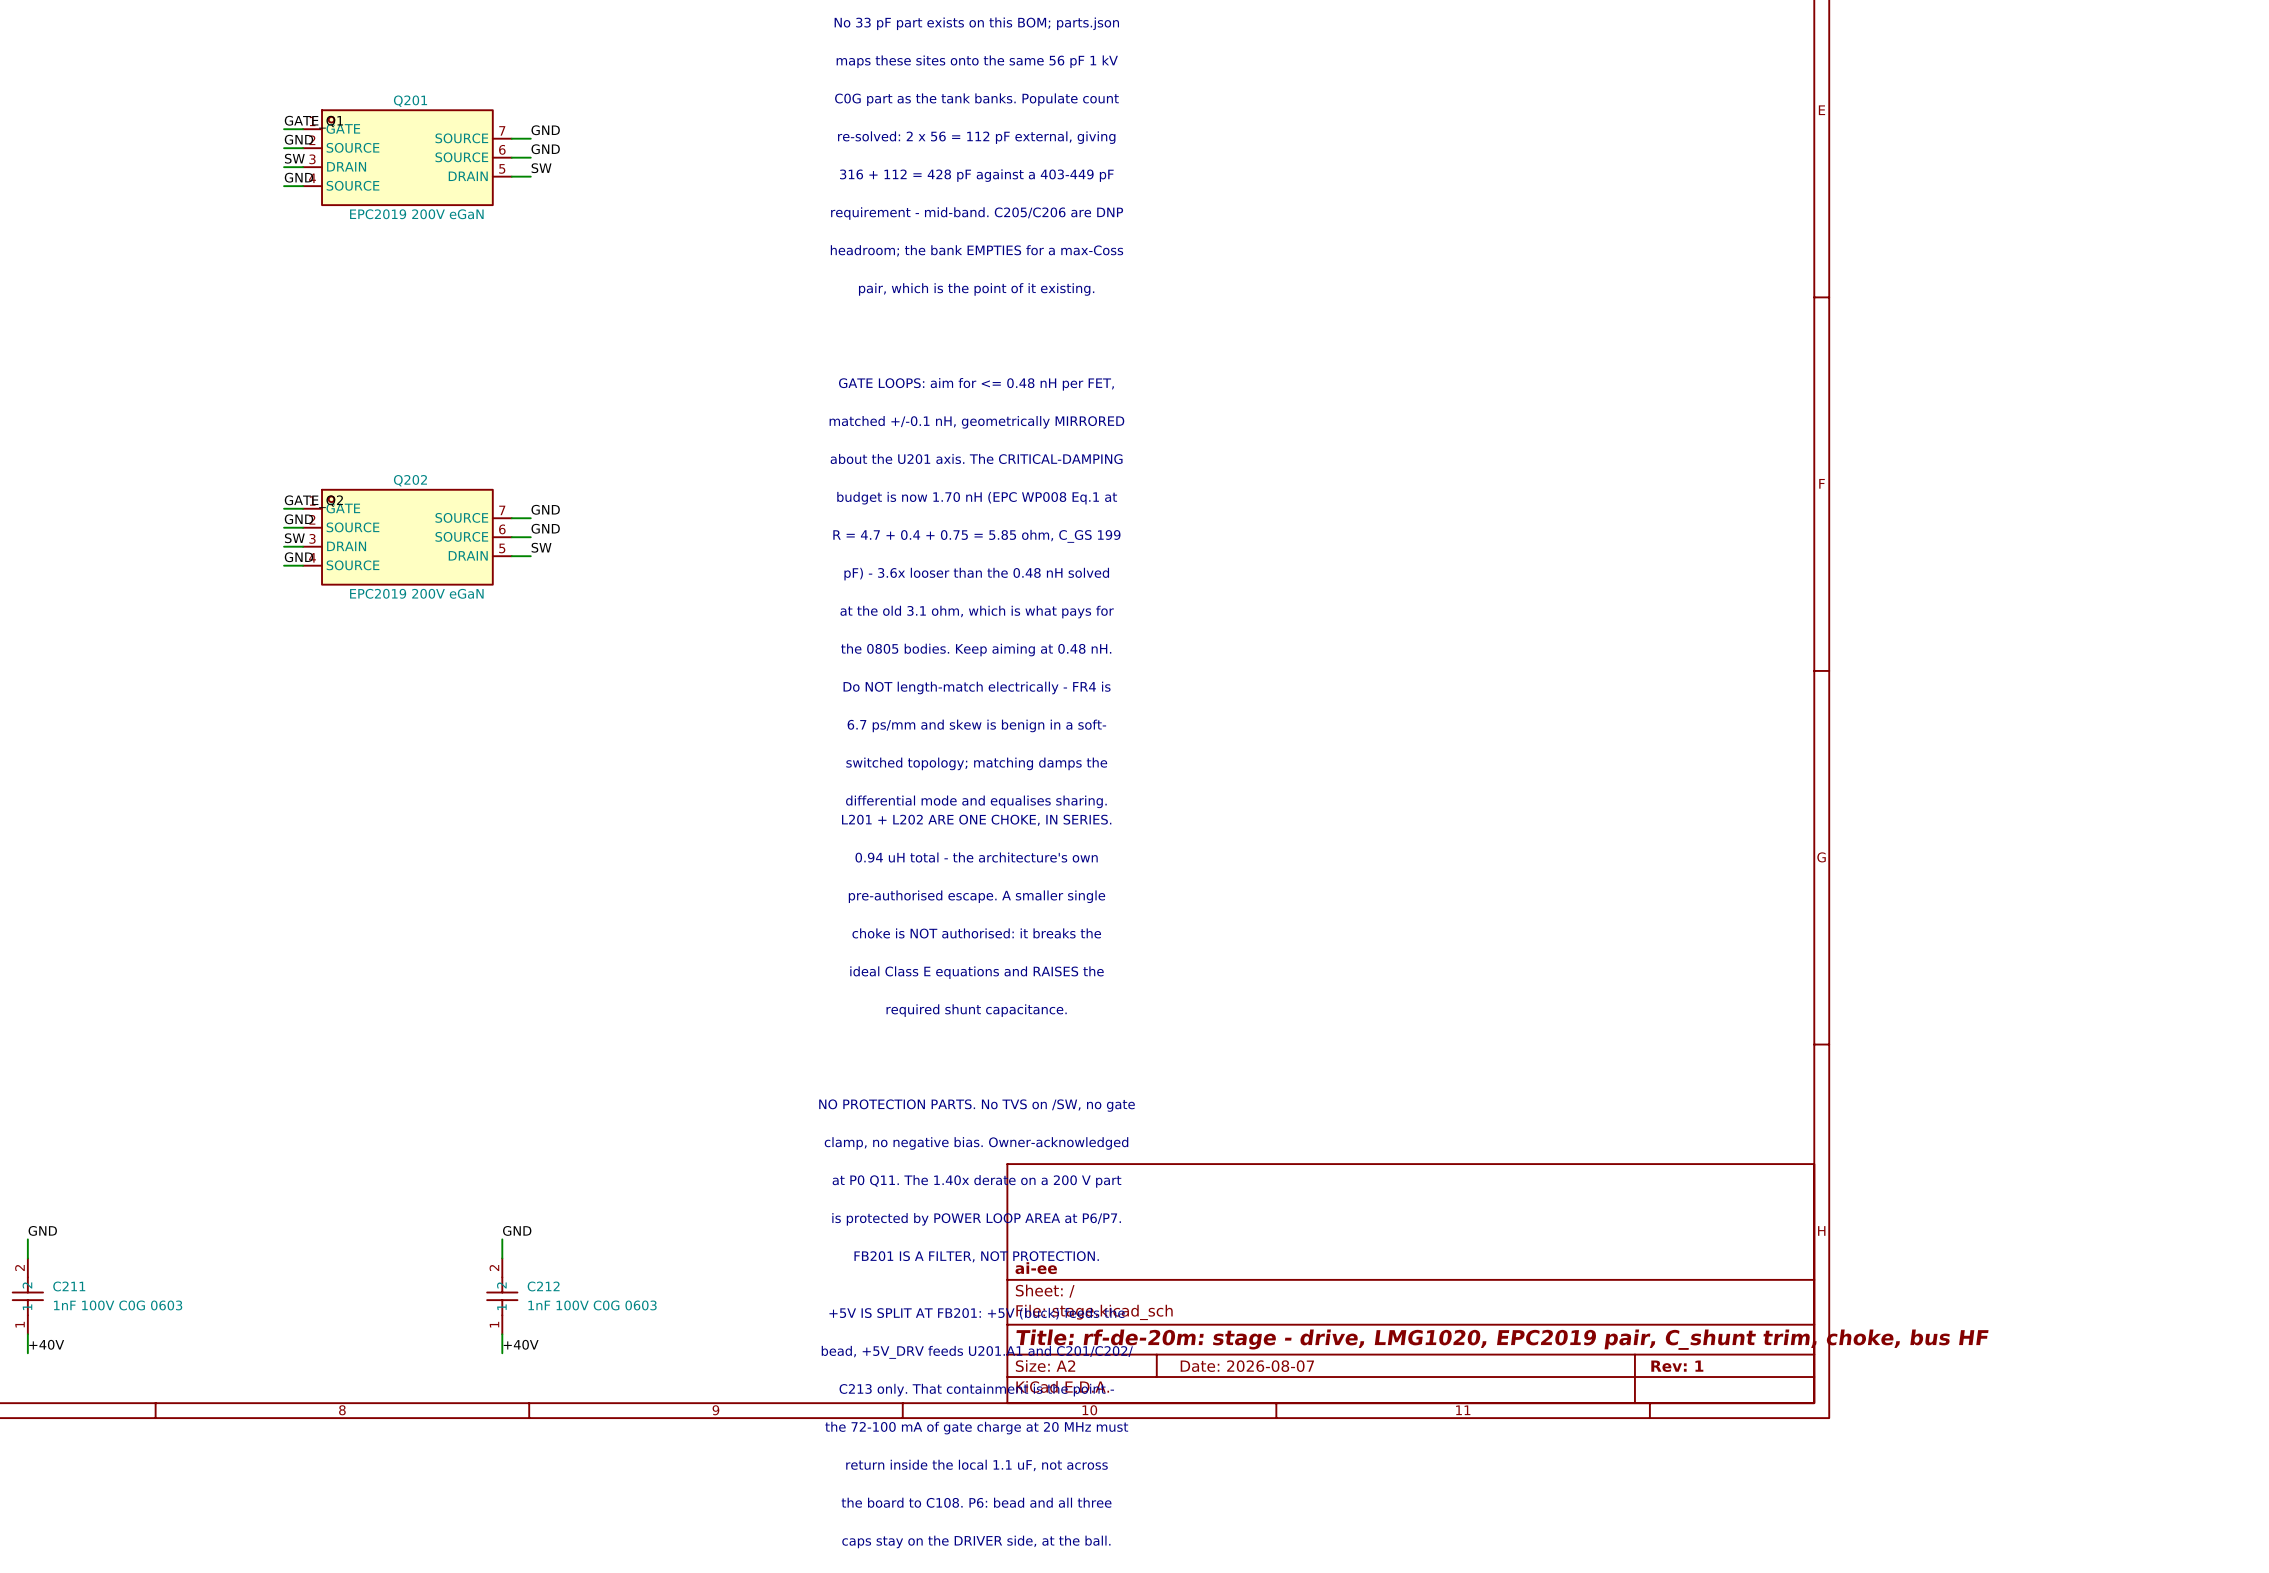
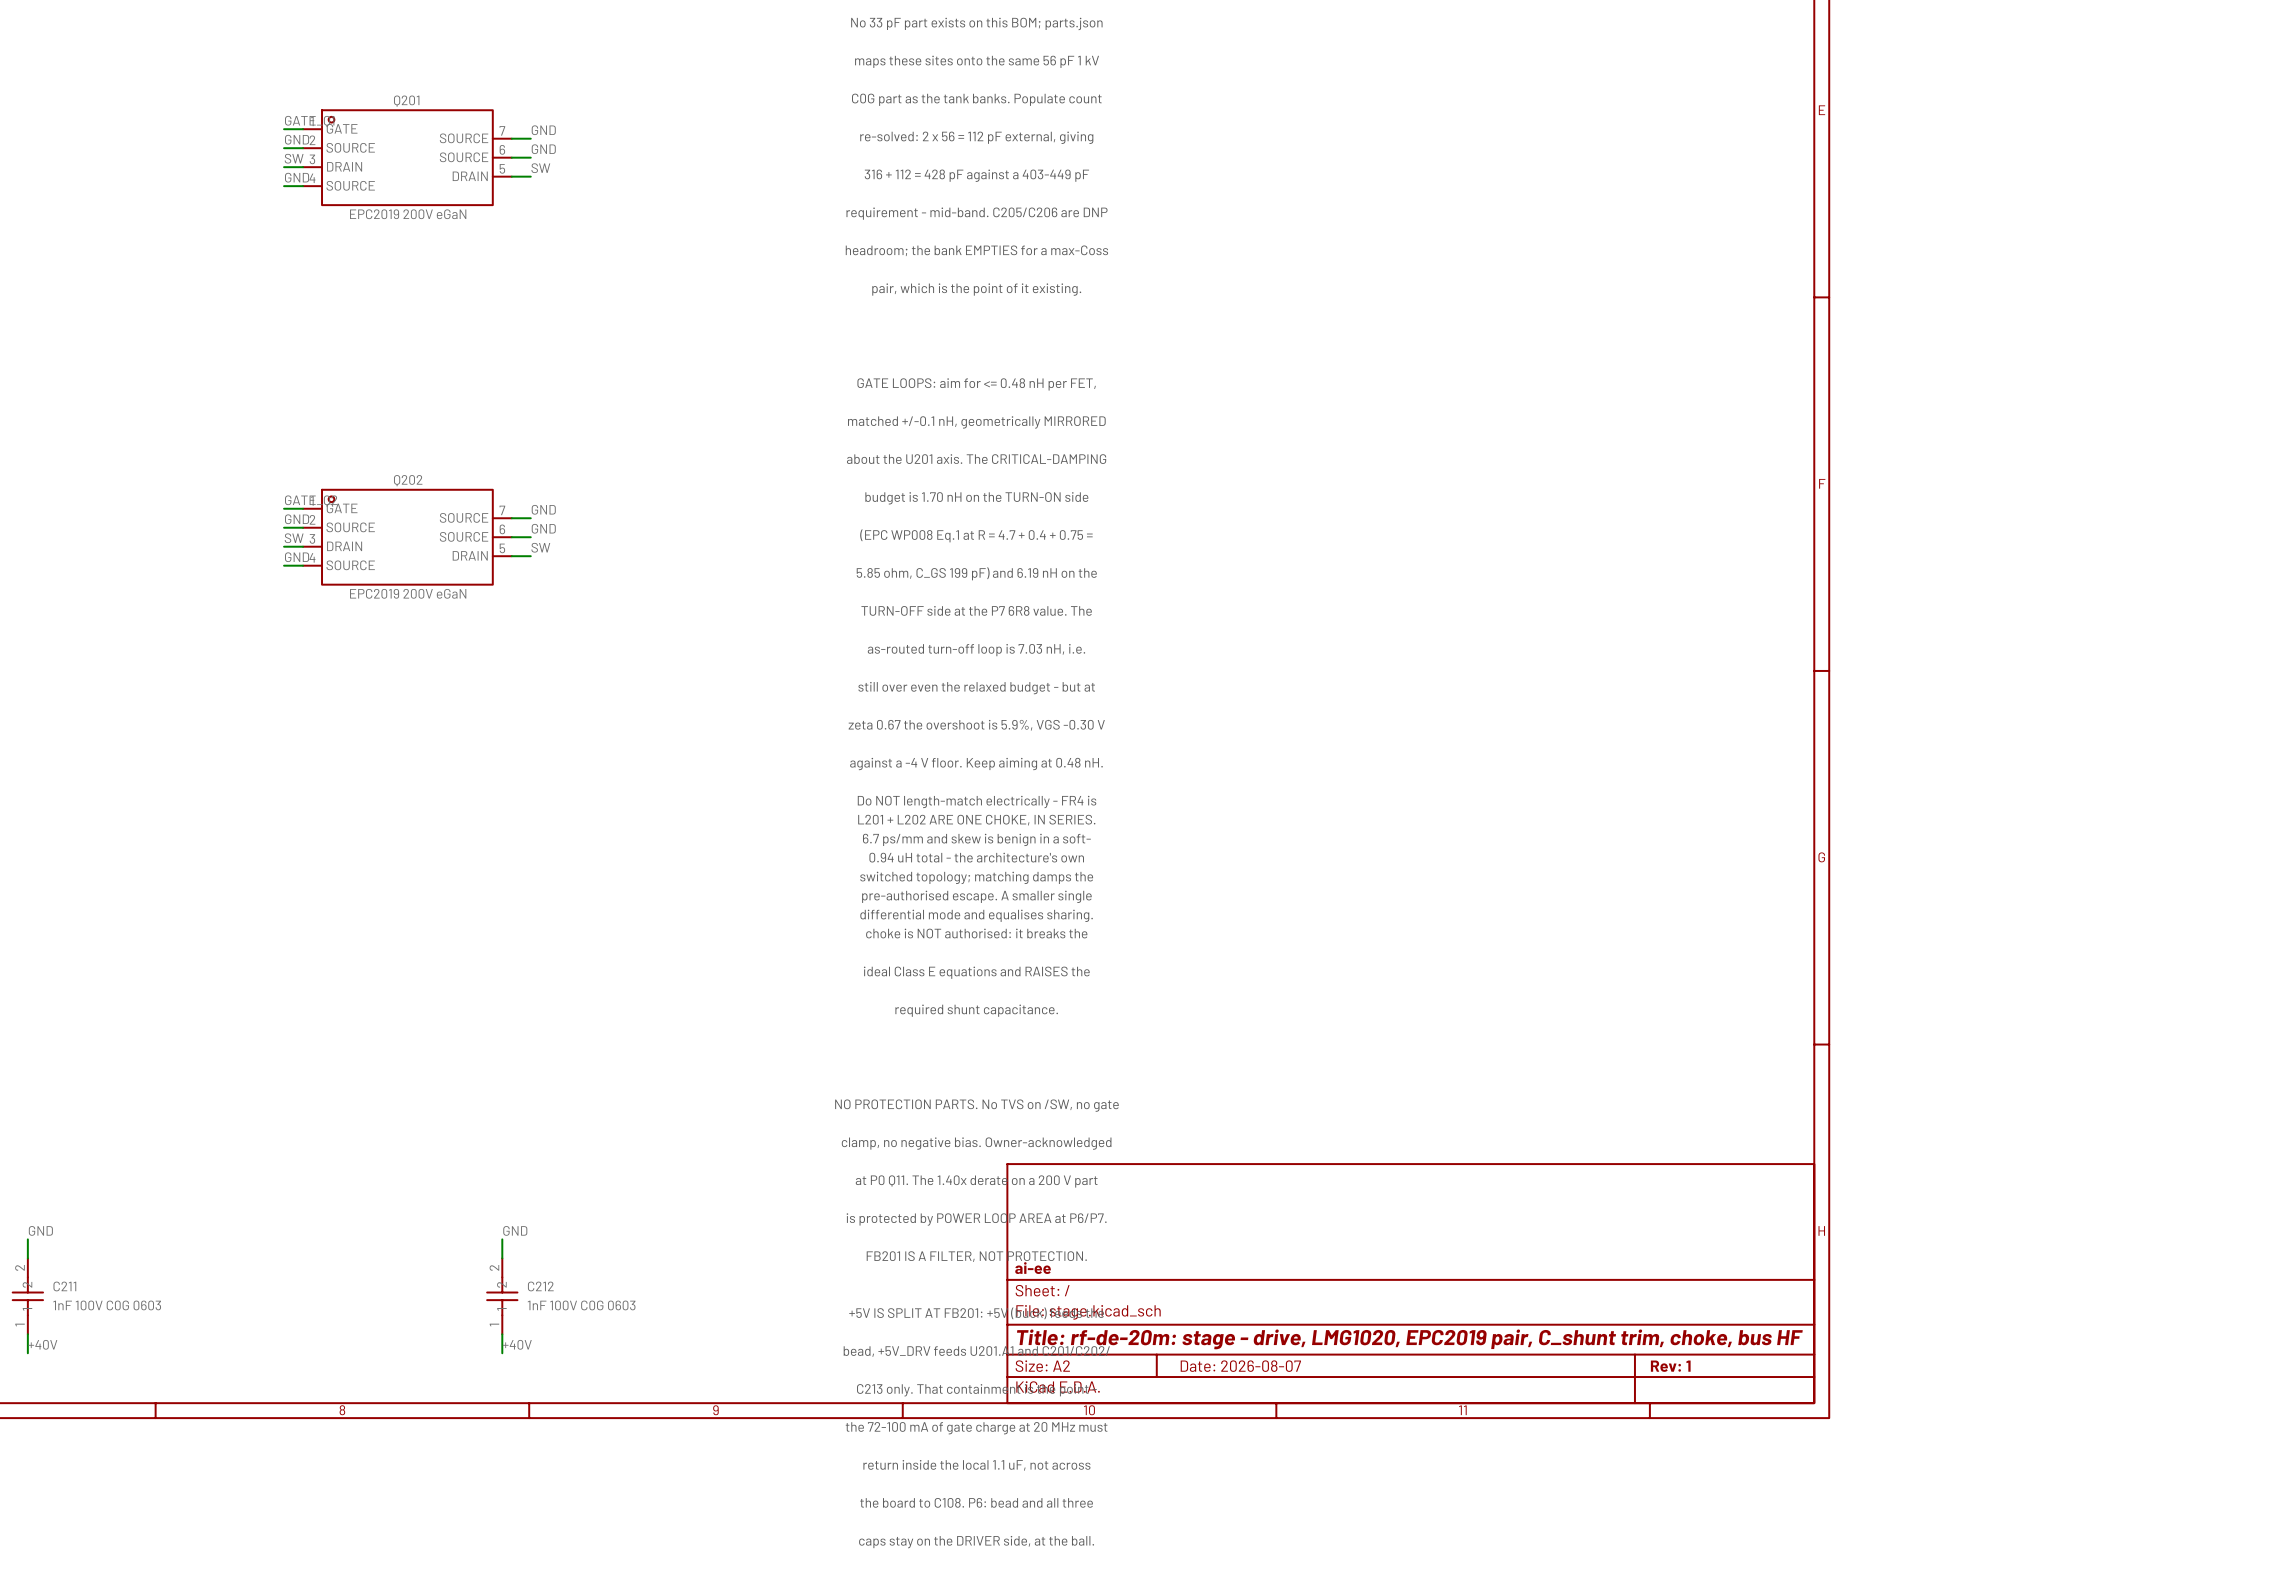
text: budget is now 1.70 nH (EPC WP008 Eq.1 at (977, 498) -> budget is 1.70 nH on the TURN-ON side (976, 498)
text: R = 4.7 + 0.4 + 0.75 = 5.85 ohm, C_GS 199 (976, 536) -> (EPC WP008 Eq.1 at R = 4.7 + 0.4 + 0.75 = (976, 535)
text: pF) - 3.6x looser than the 0.48 nH solved (976, 574) -> 5.85 ohm, C_GS 199 pF) and 6.19 nH on the (976, 573)
text: at the old 3.1 ohm, which is what pays for (977, 612) -> TURN-OFF side at the P7 6R8 value. The (976, 610)
text: the 0805 bodies. Keep aiming at 0.48 nH. (976, 650) -> as-routed turn-off loop is 7.03 nH, i.e. (976, 650)
text: Do NOT length-match electrically - FR4 is (977, 687) -> still over even the relaxed budget - but at (976, 688)
text: 6.7 ps/mm and skew is benign in a soft- (976, 725) -> zeta 0.67 the overshoot is 5.9%, VGS -0.30 V (976, 725)
text: switched topology; matching damps the (976, 763) -> against a -4 V floor. Keep aiming at 0.48 nH. (976, 764)
text: differential mode and equalises sharing. (976, 801) -> Do NOT length-match electrically - FR4 is (977, 801)
text: none -> 6.7 ps/mm and skew is benign in a soft- (976, 839)
text: none -> switched topology; matching damps the (976, 877)
text: none -> differential mode and equalises sharing. (976, 915)

